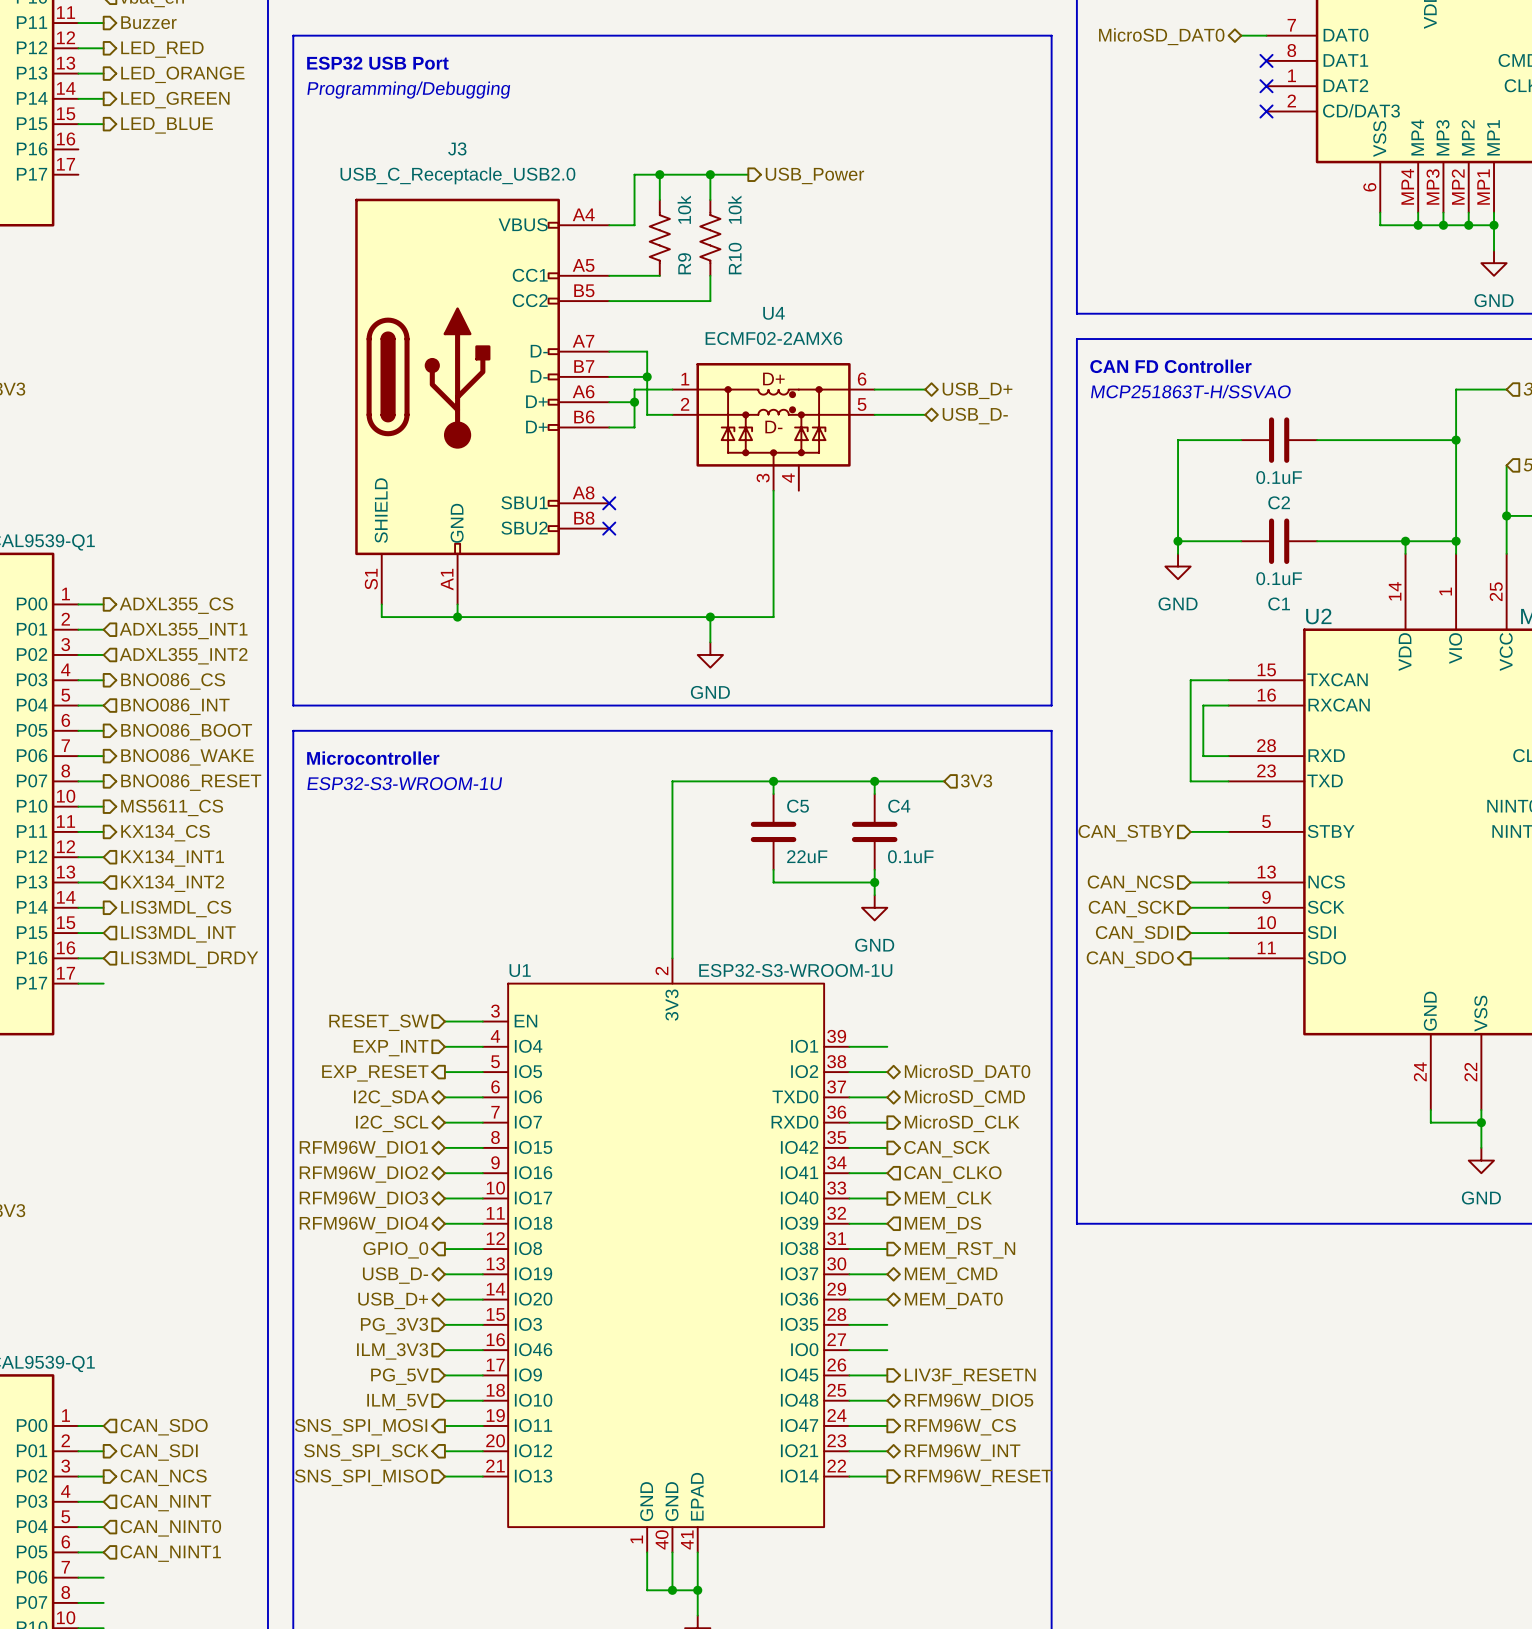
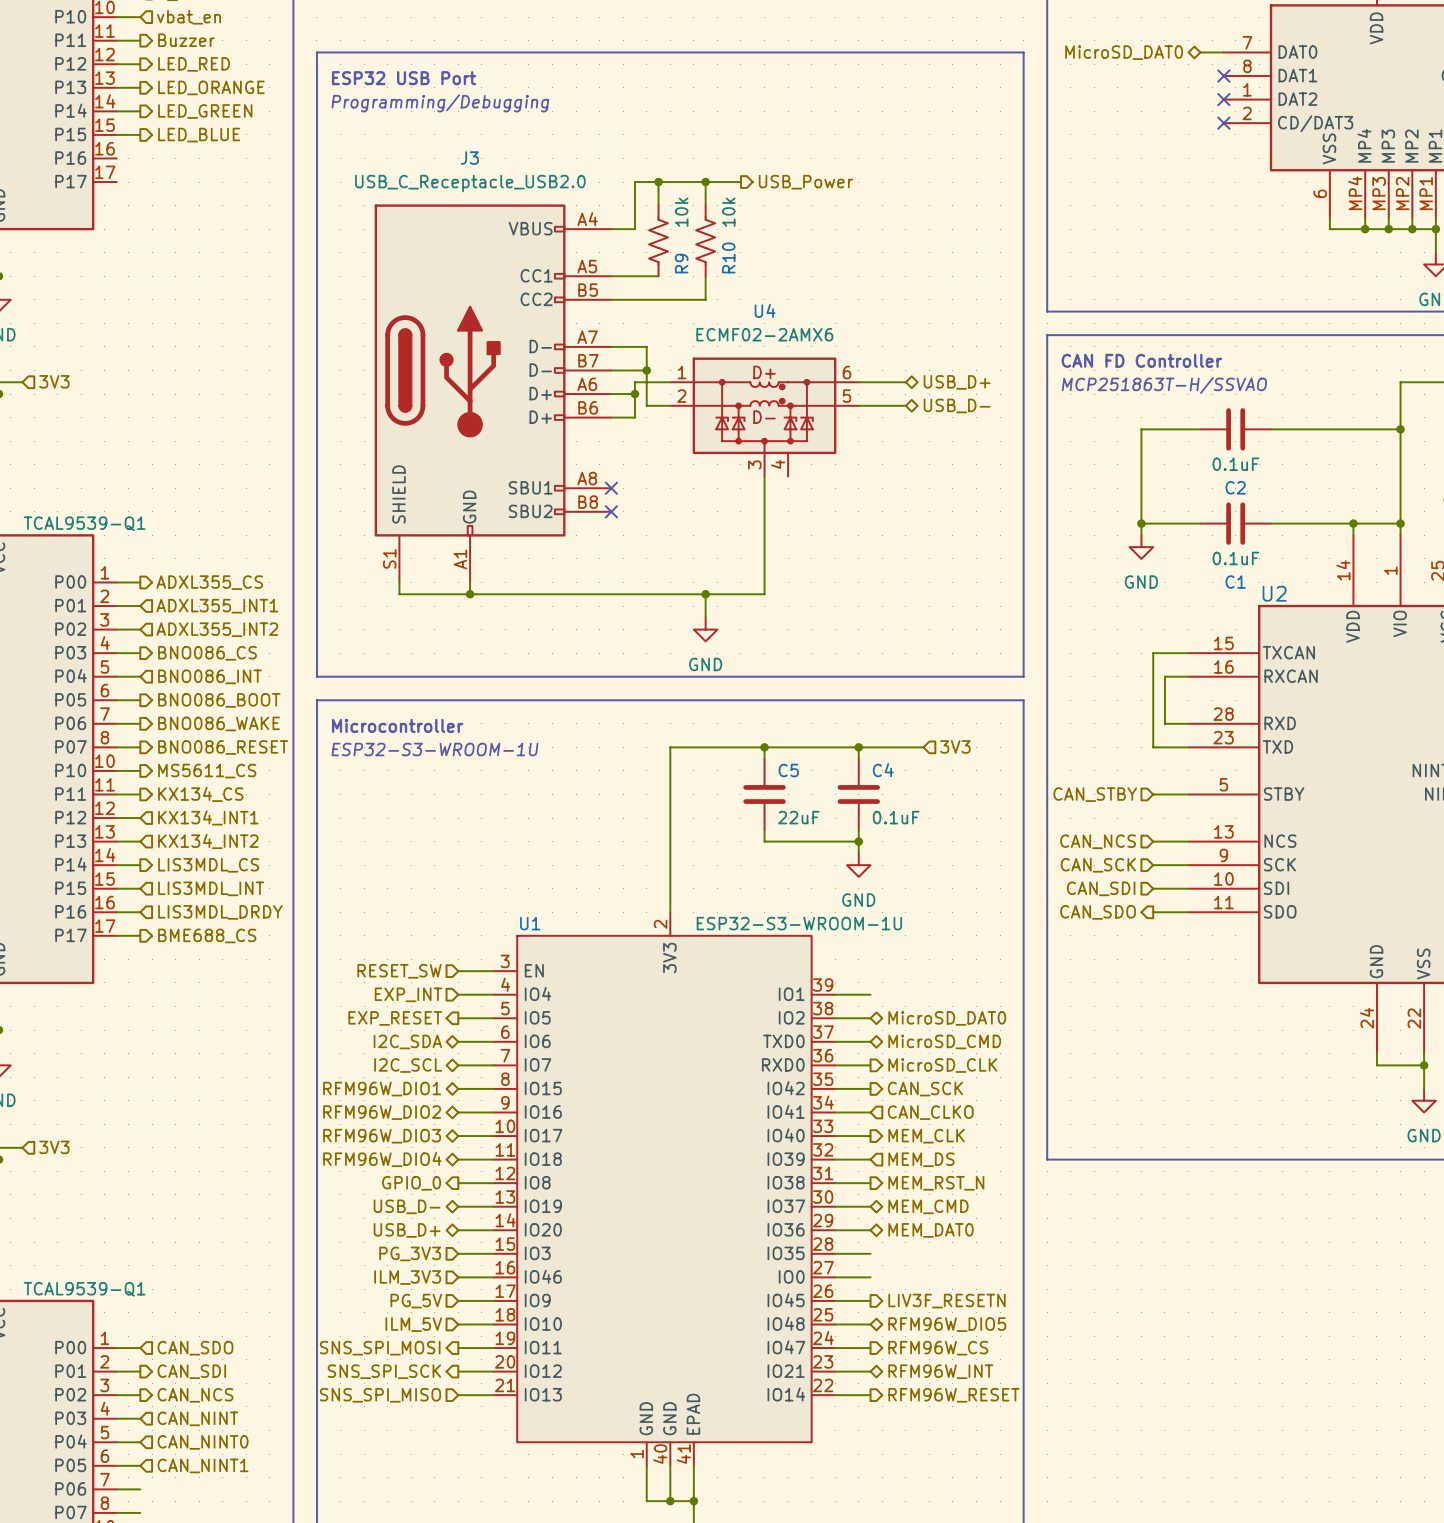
hierarchical label: none -> BME688_CS (207, 935)

